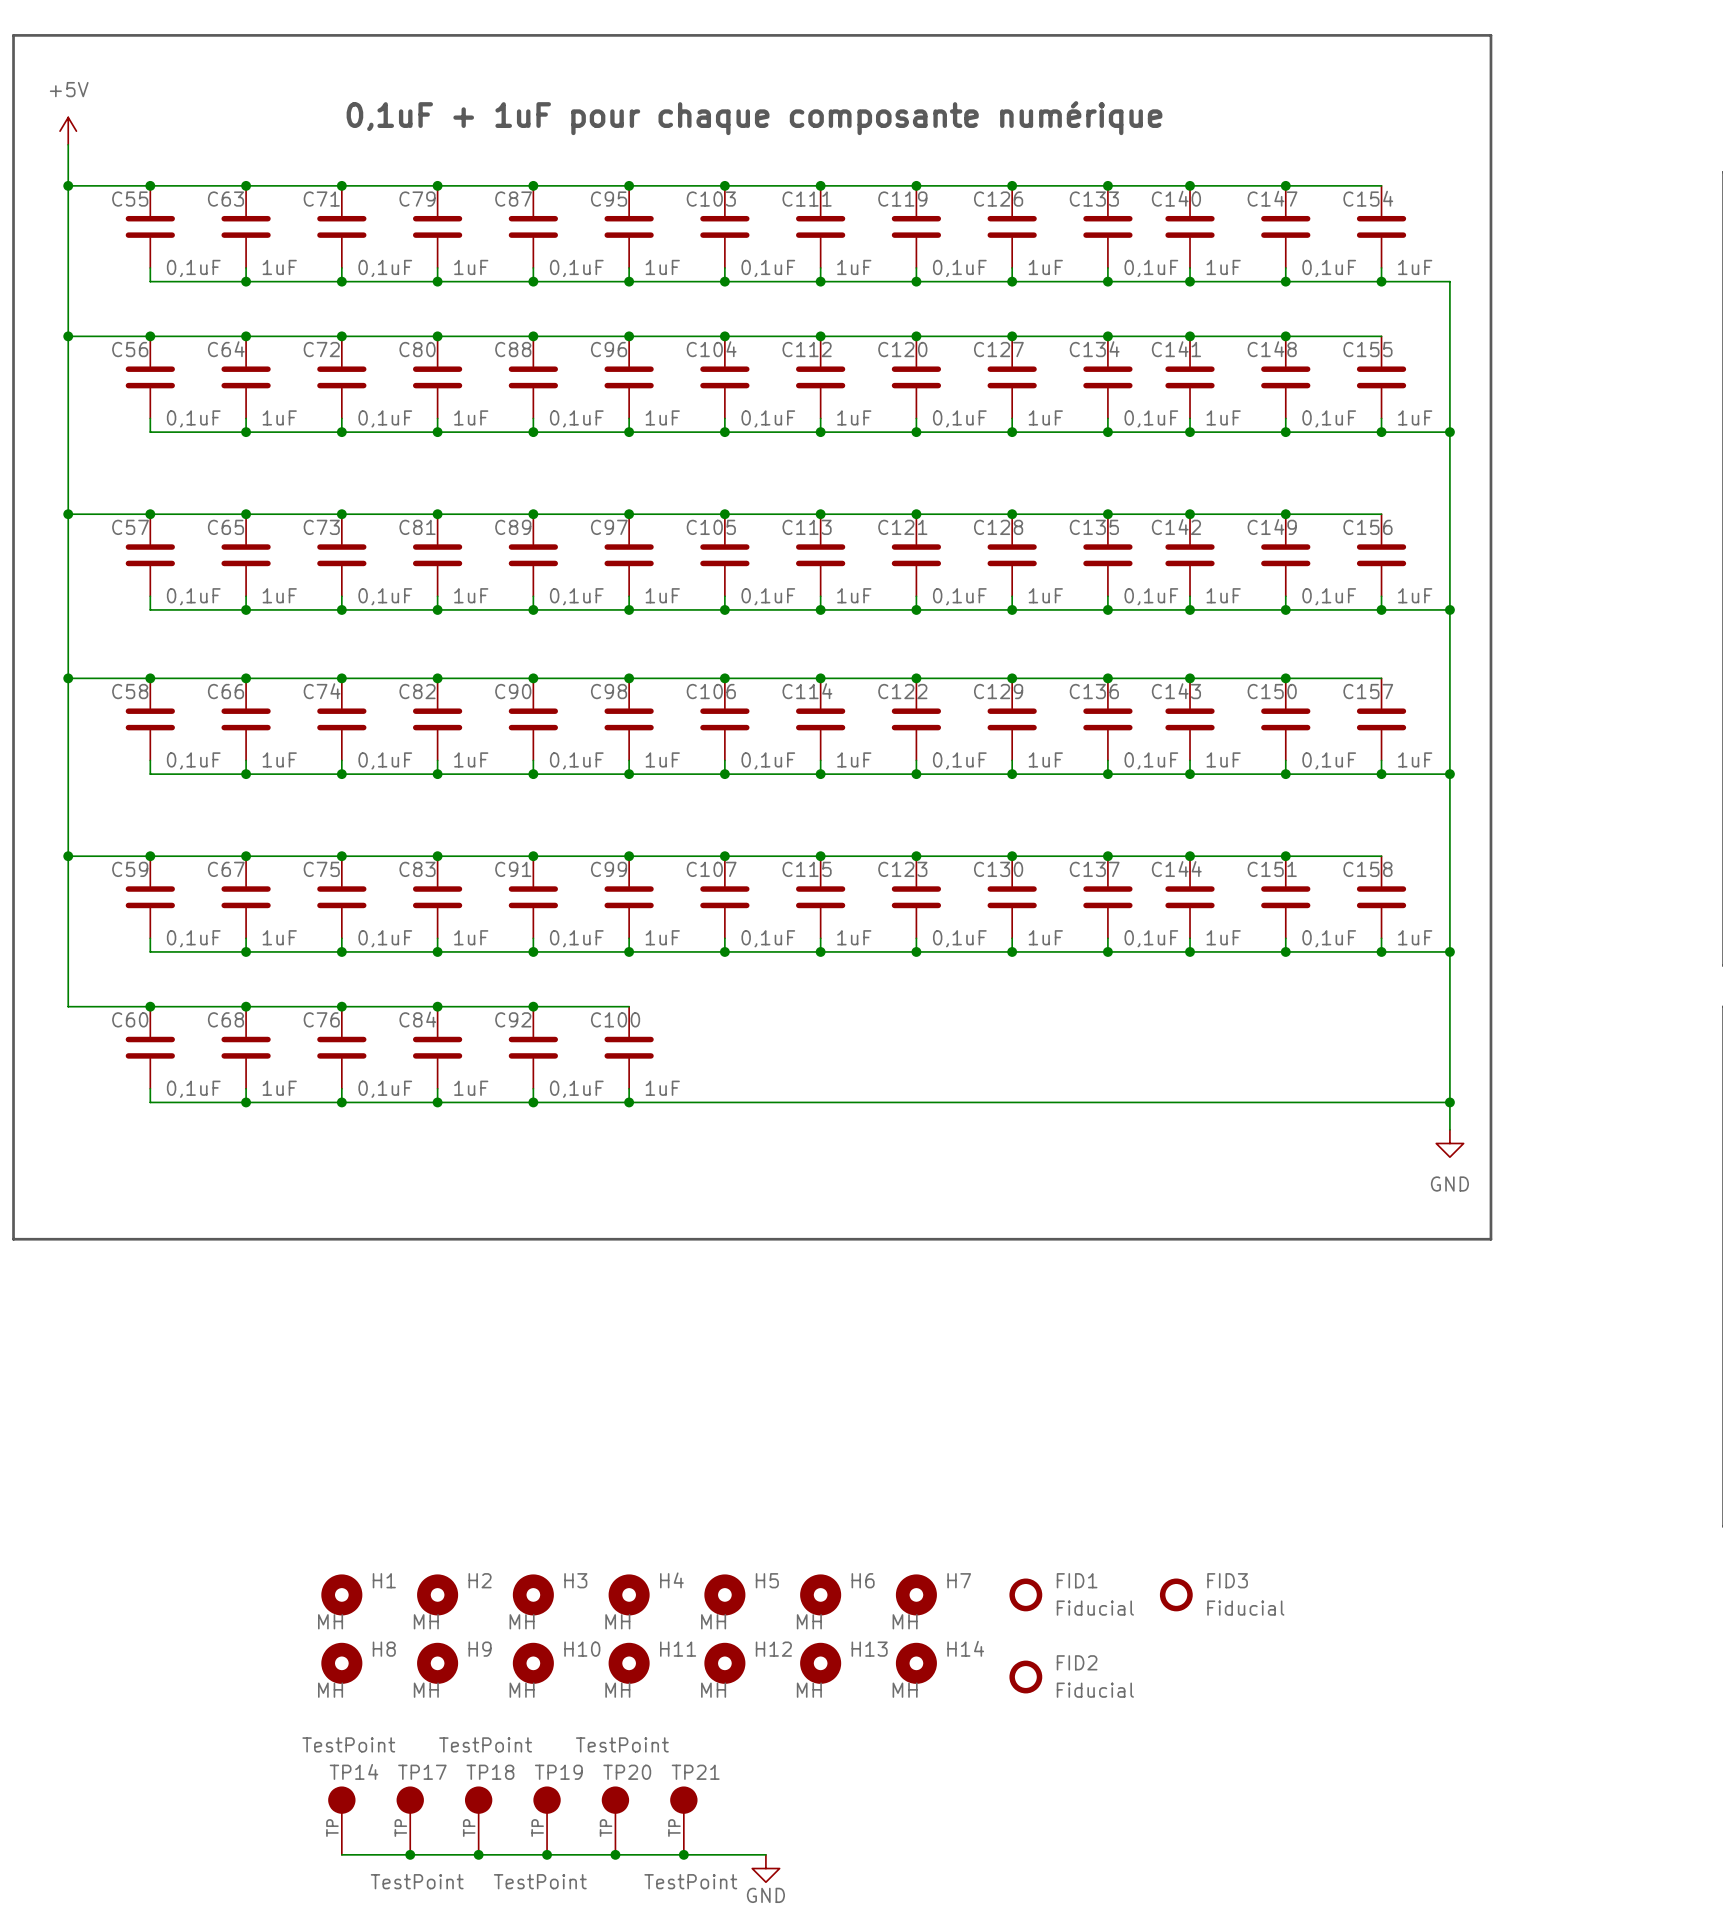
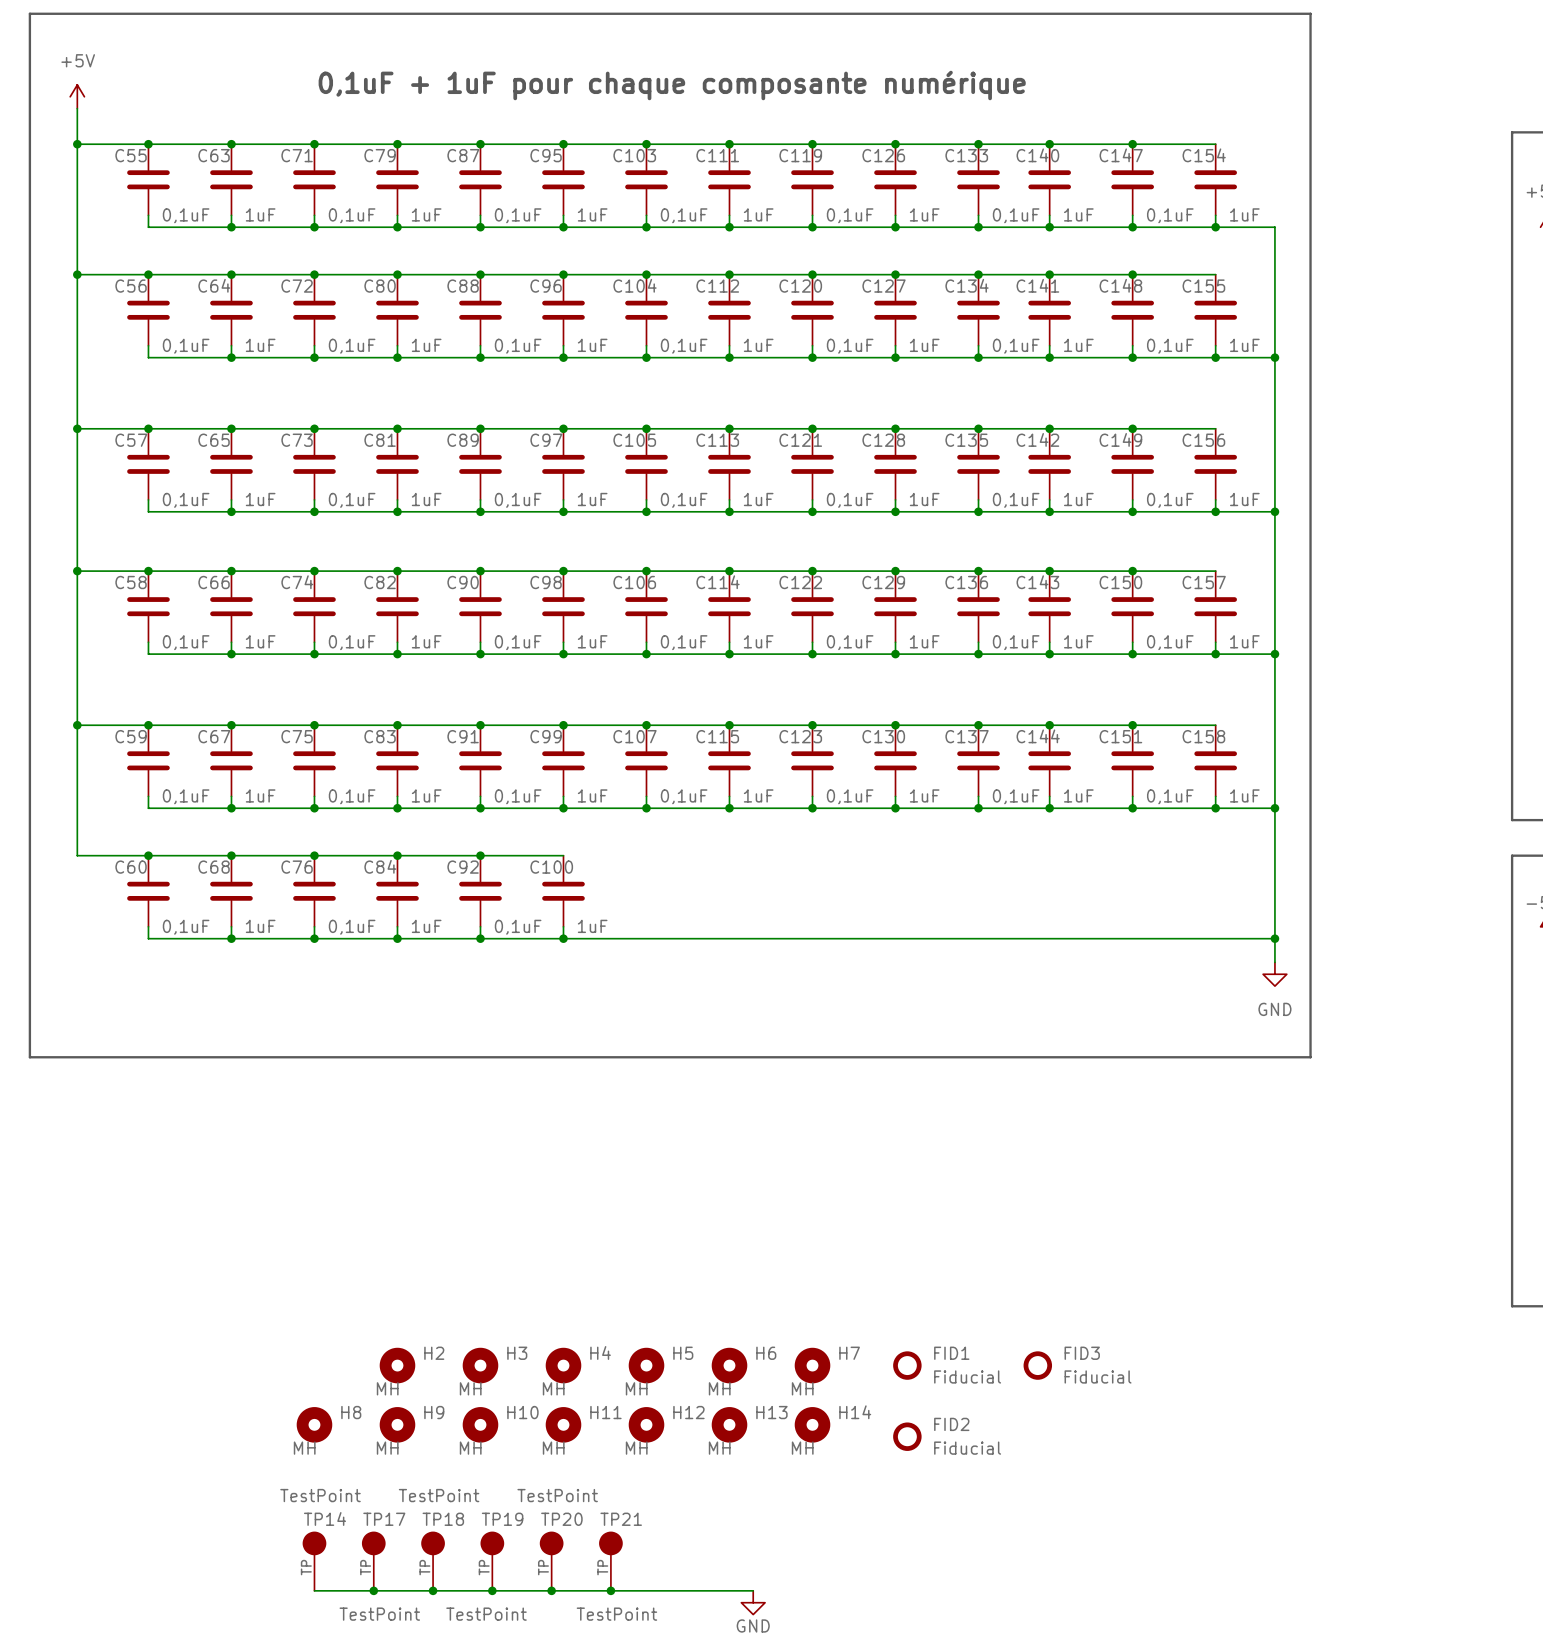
H1: MH (341, 1594) -> none
wire: none -> (682, 1590) (753, 1590)
power symbol position: GND (765, 1868) -> GND (753, 1602)

